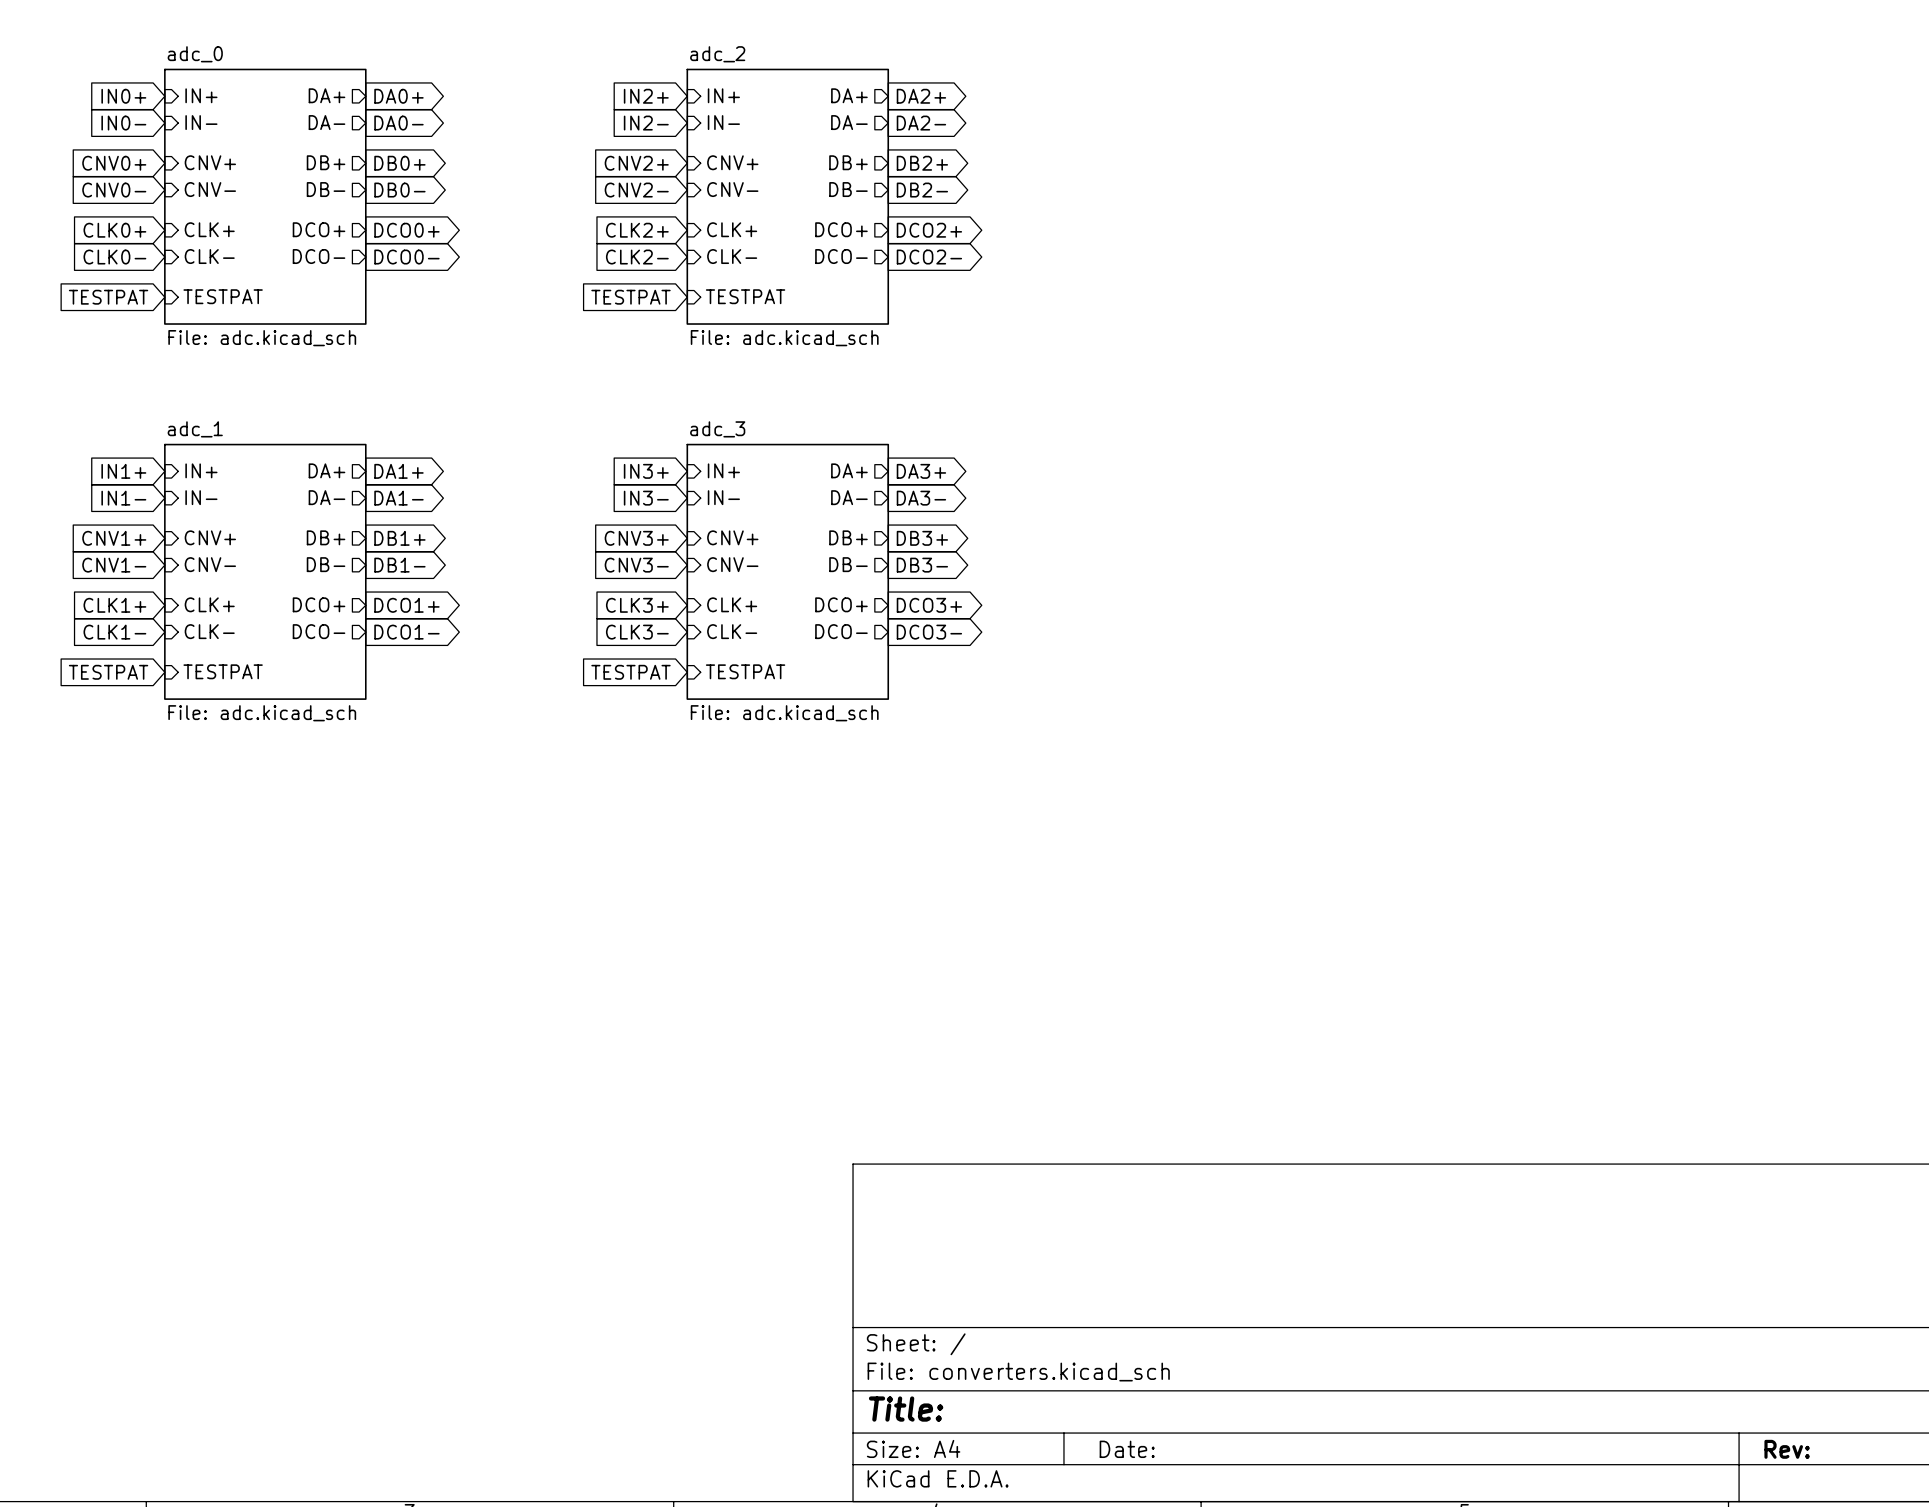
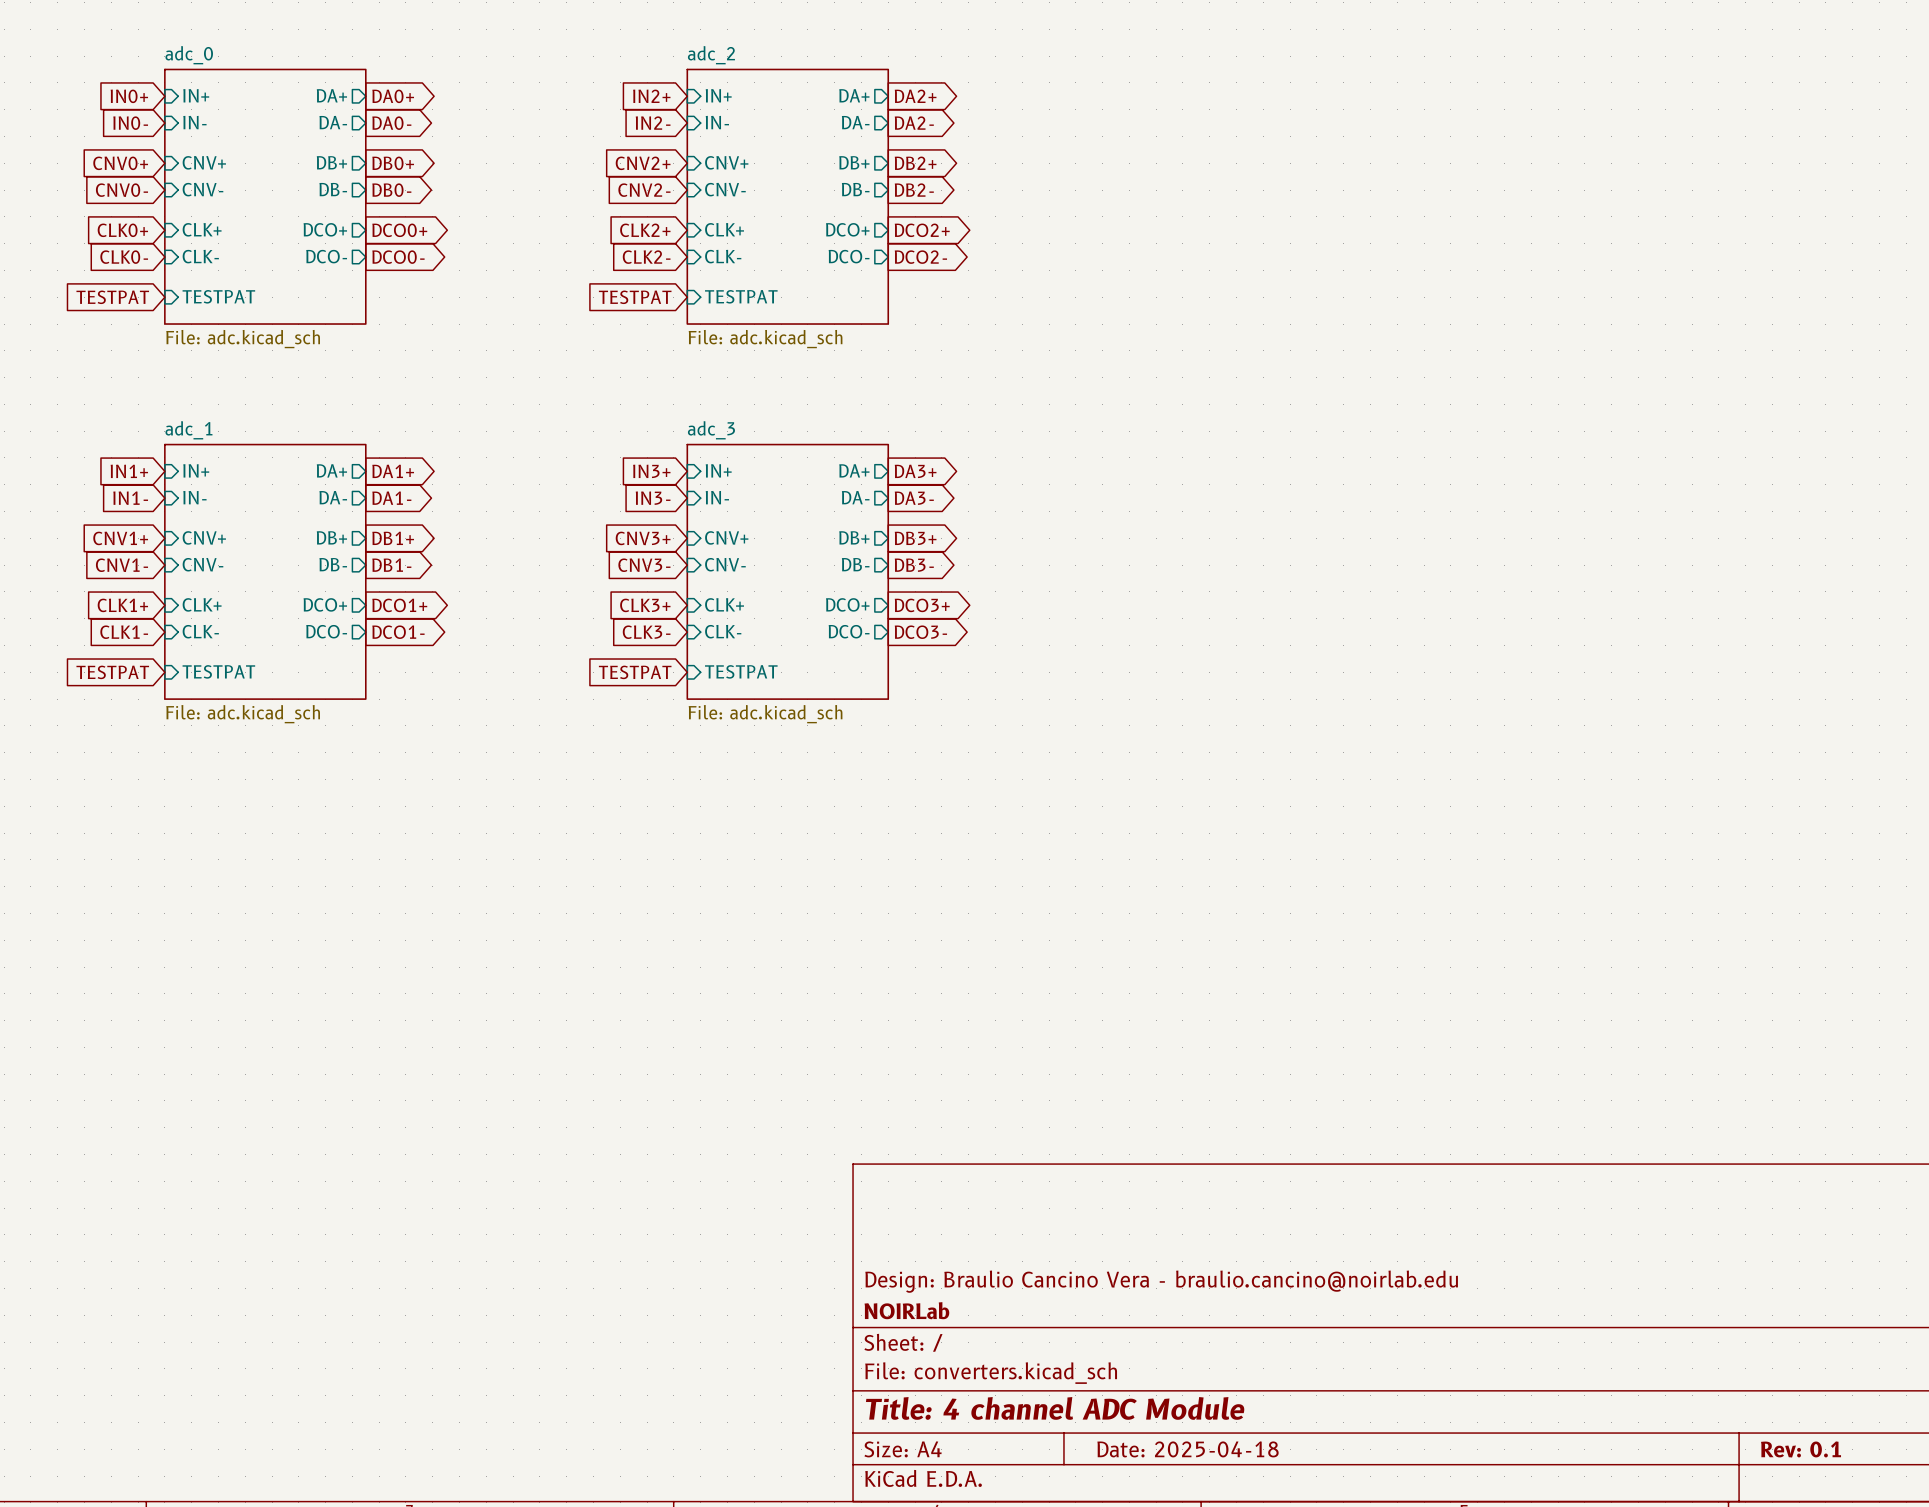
title block: none -> Design: Braulio Cancino Vera - braulio.cancino@noirlab.edu (1161, 1281)
title block: none -> NOIRLab (906, 1310)
title block: Title: (906, 1409) -> Title: 4 channel ADC Module (1055, 1408)
title block: Date: (1127, 1449) -> Date: 2025-04-18 (1188, 1449)
title block: Rev: (1787, 1449) -> Rev: 0.1 (1801, 1449)

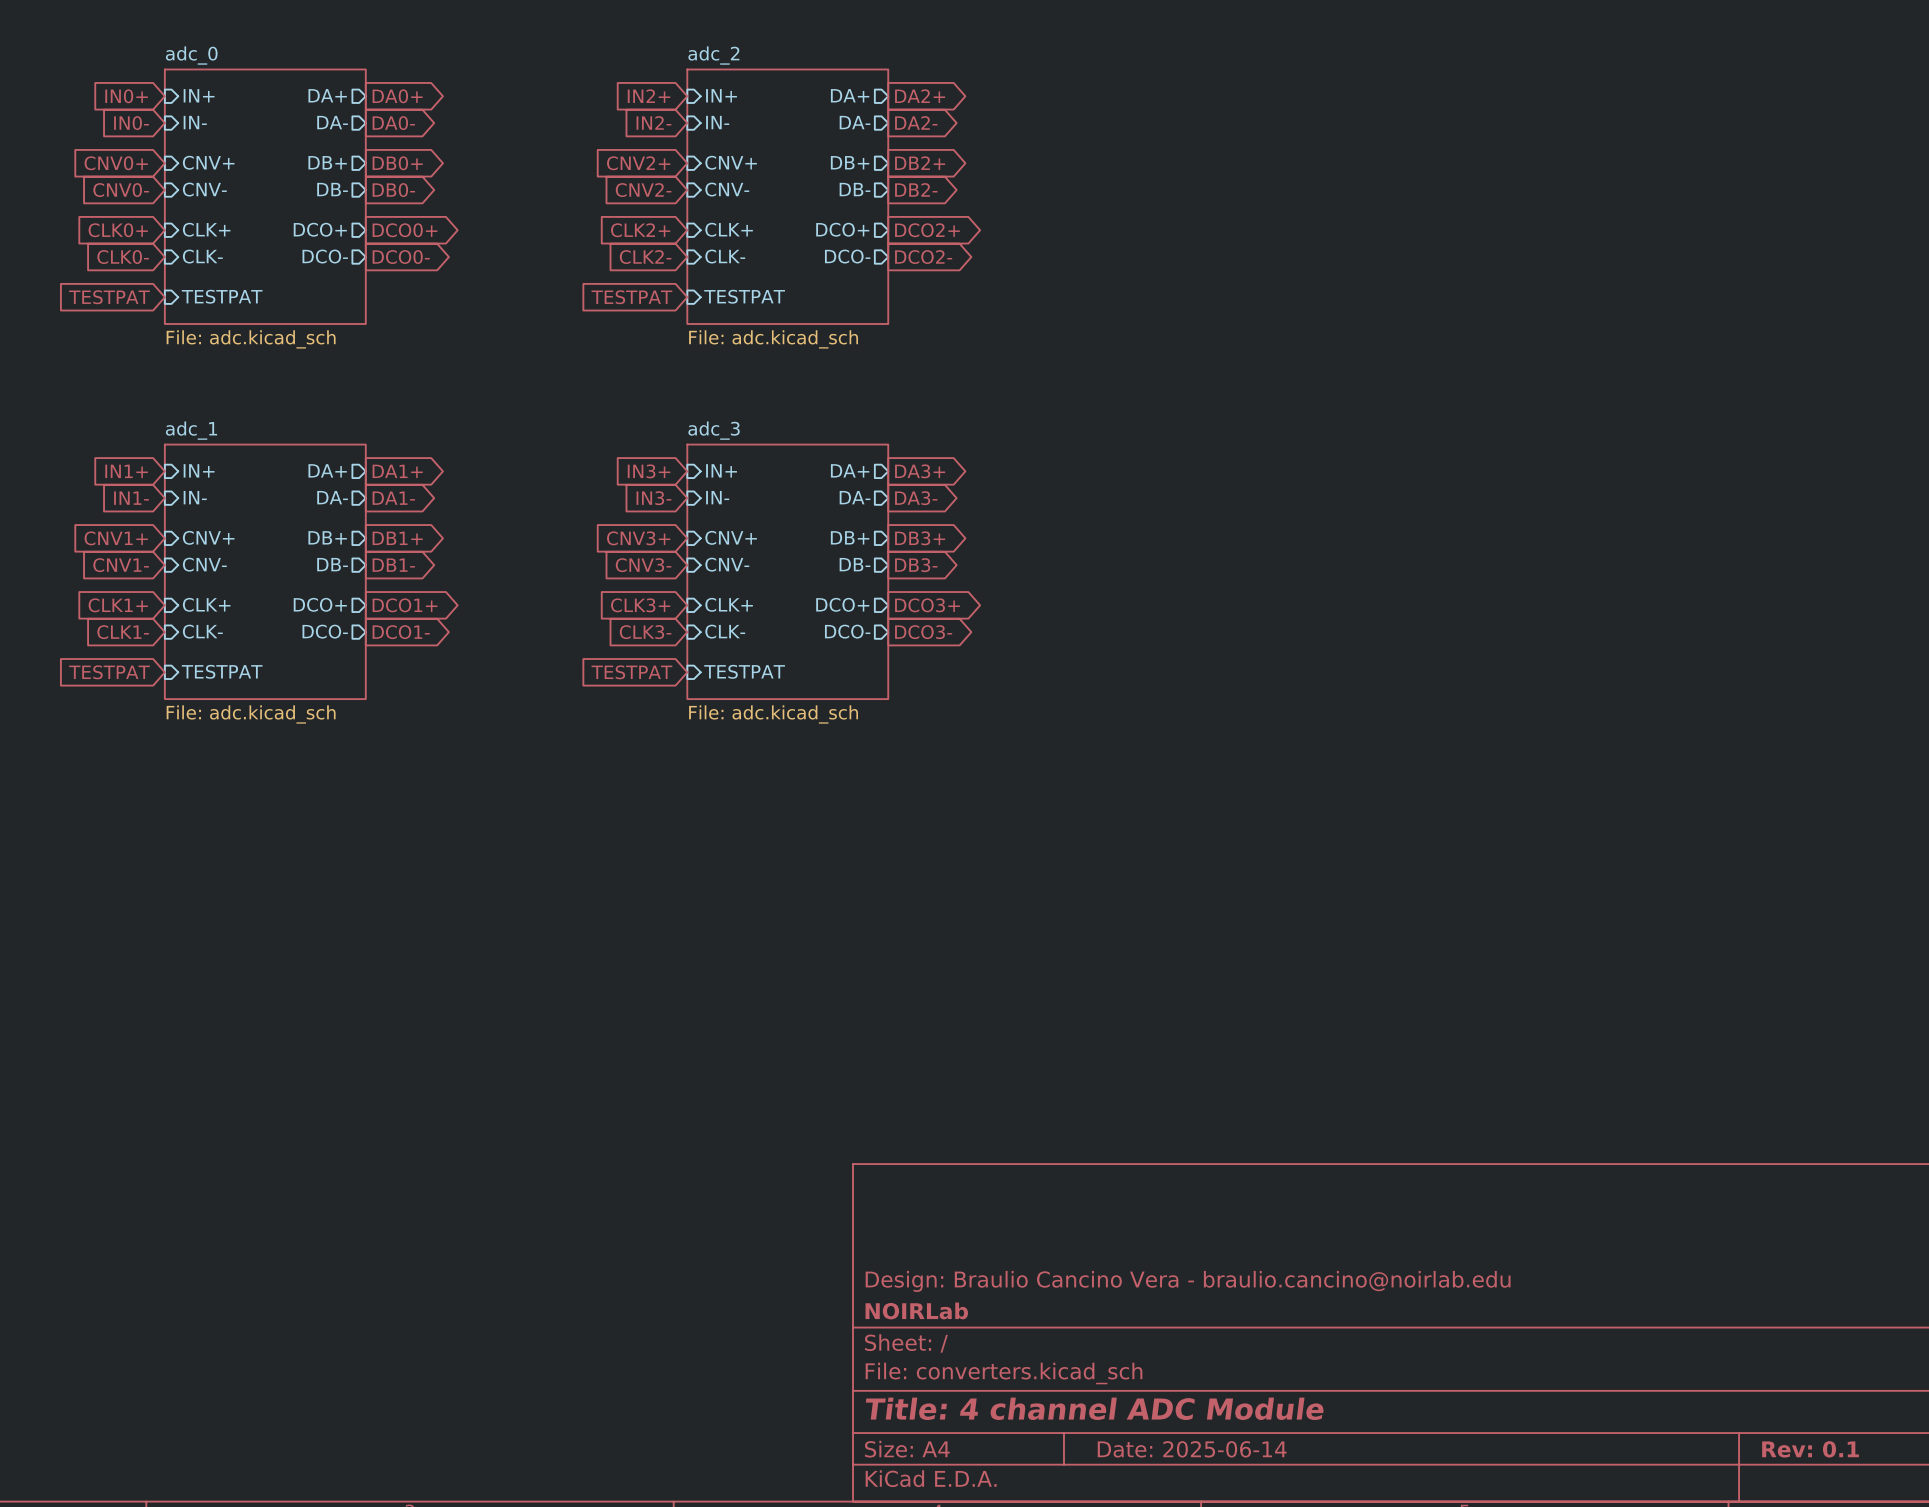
title block: Date: 2025-04-18 (1188, 1449) -> Date: 2025-06-14 (1192, 1449)

